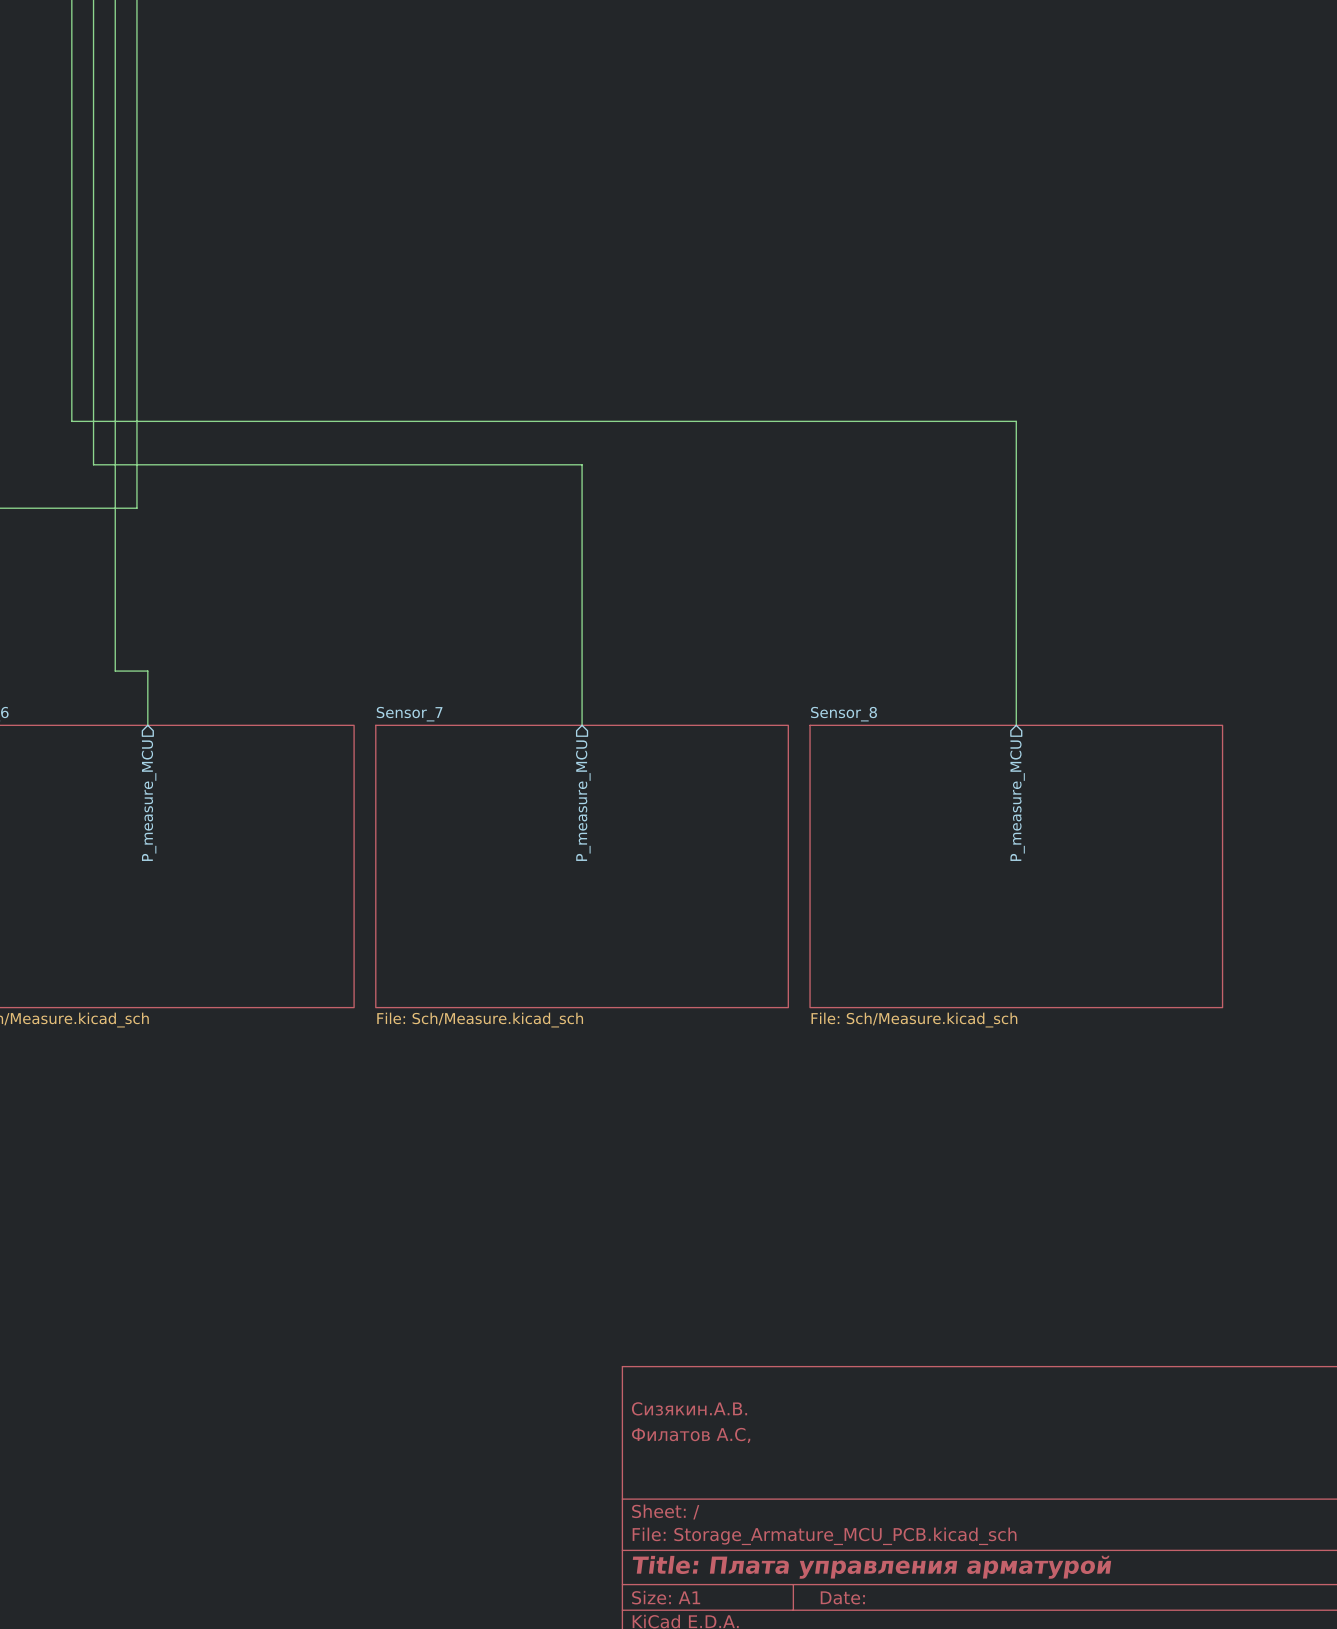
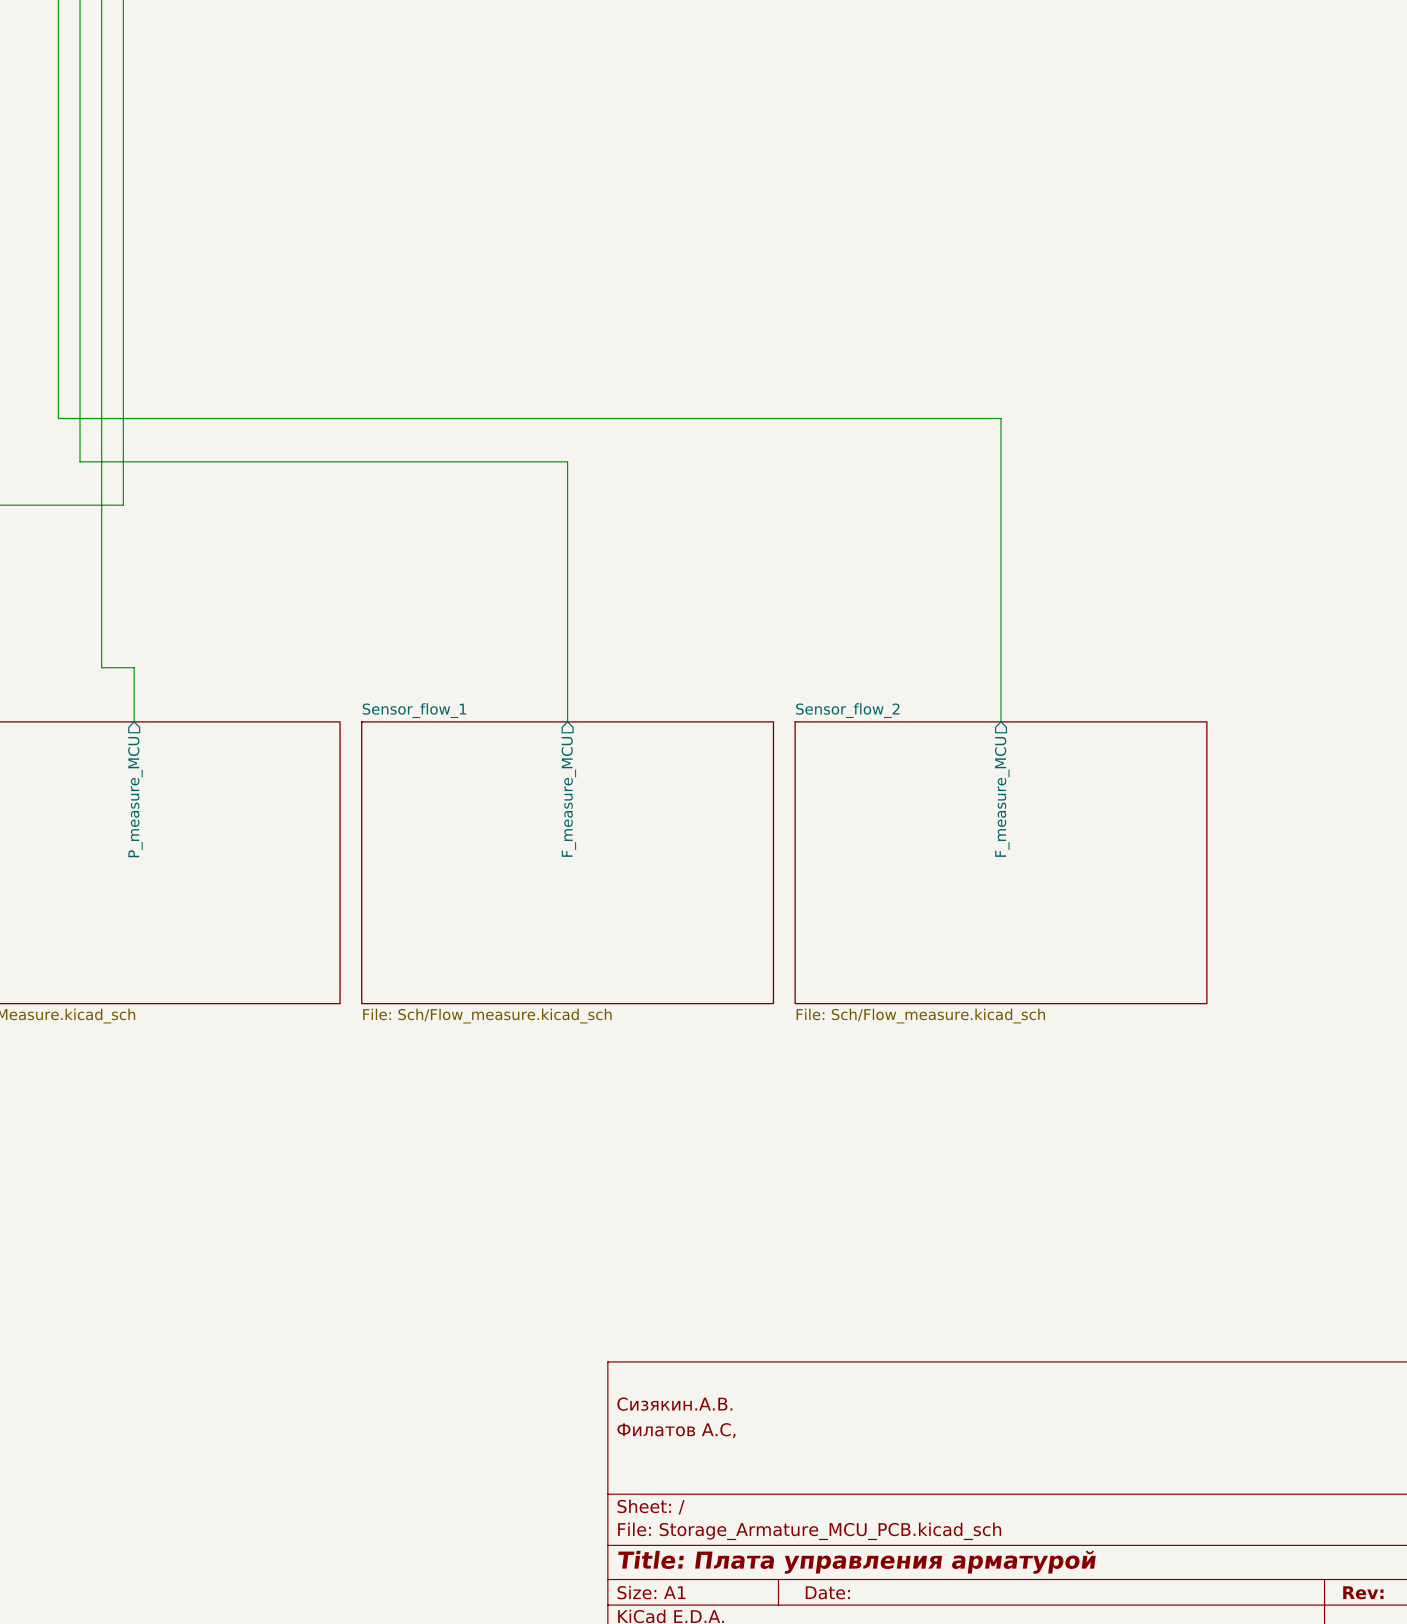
sheet Sensor_7 name: Sensor_7 (409, 714) -> Sensor_flow_1 (414, 710)
sheet Sensor_8 name: Sensor_8 (843, 714) -> Sensor_flow_2 (847, 710)
sheet pin: P_measure_MCU (583, 800) -> F_measure_MCU (568, 796)
sheet pin: P_measure_MCU (1017, 800) -> F_measure_MCU (1002, 796)
sheet Sensor_7 value: File: Sch/Measure.kicad_sch (480, 1020) -> File: Sch/Flow_measure.kicad_sch (487, 1016)
sheet Sensor_8 value: File: Sch/Measure.kicad_sch (914, 1020) -> File: Sch/Flow_measure.kicad_sch (920, 1016)

